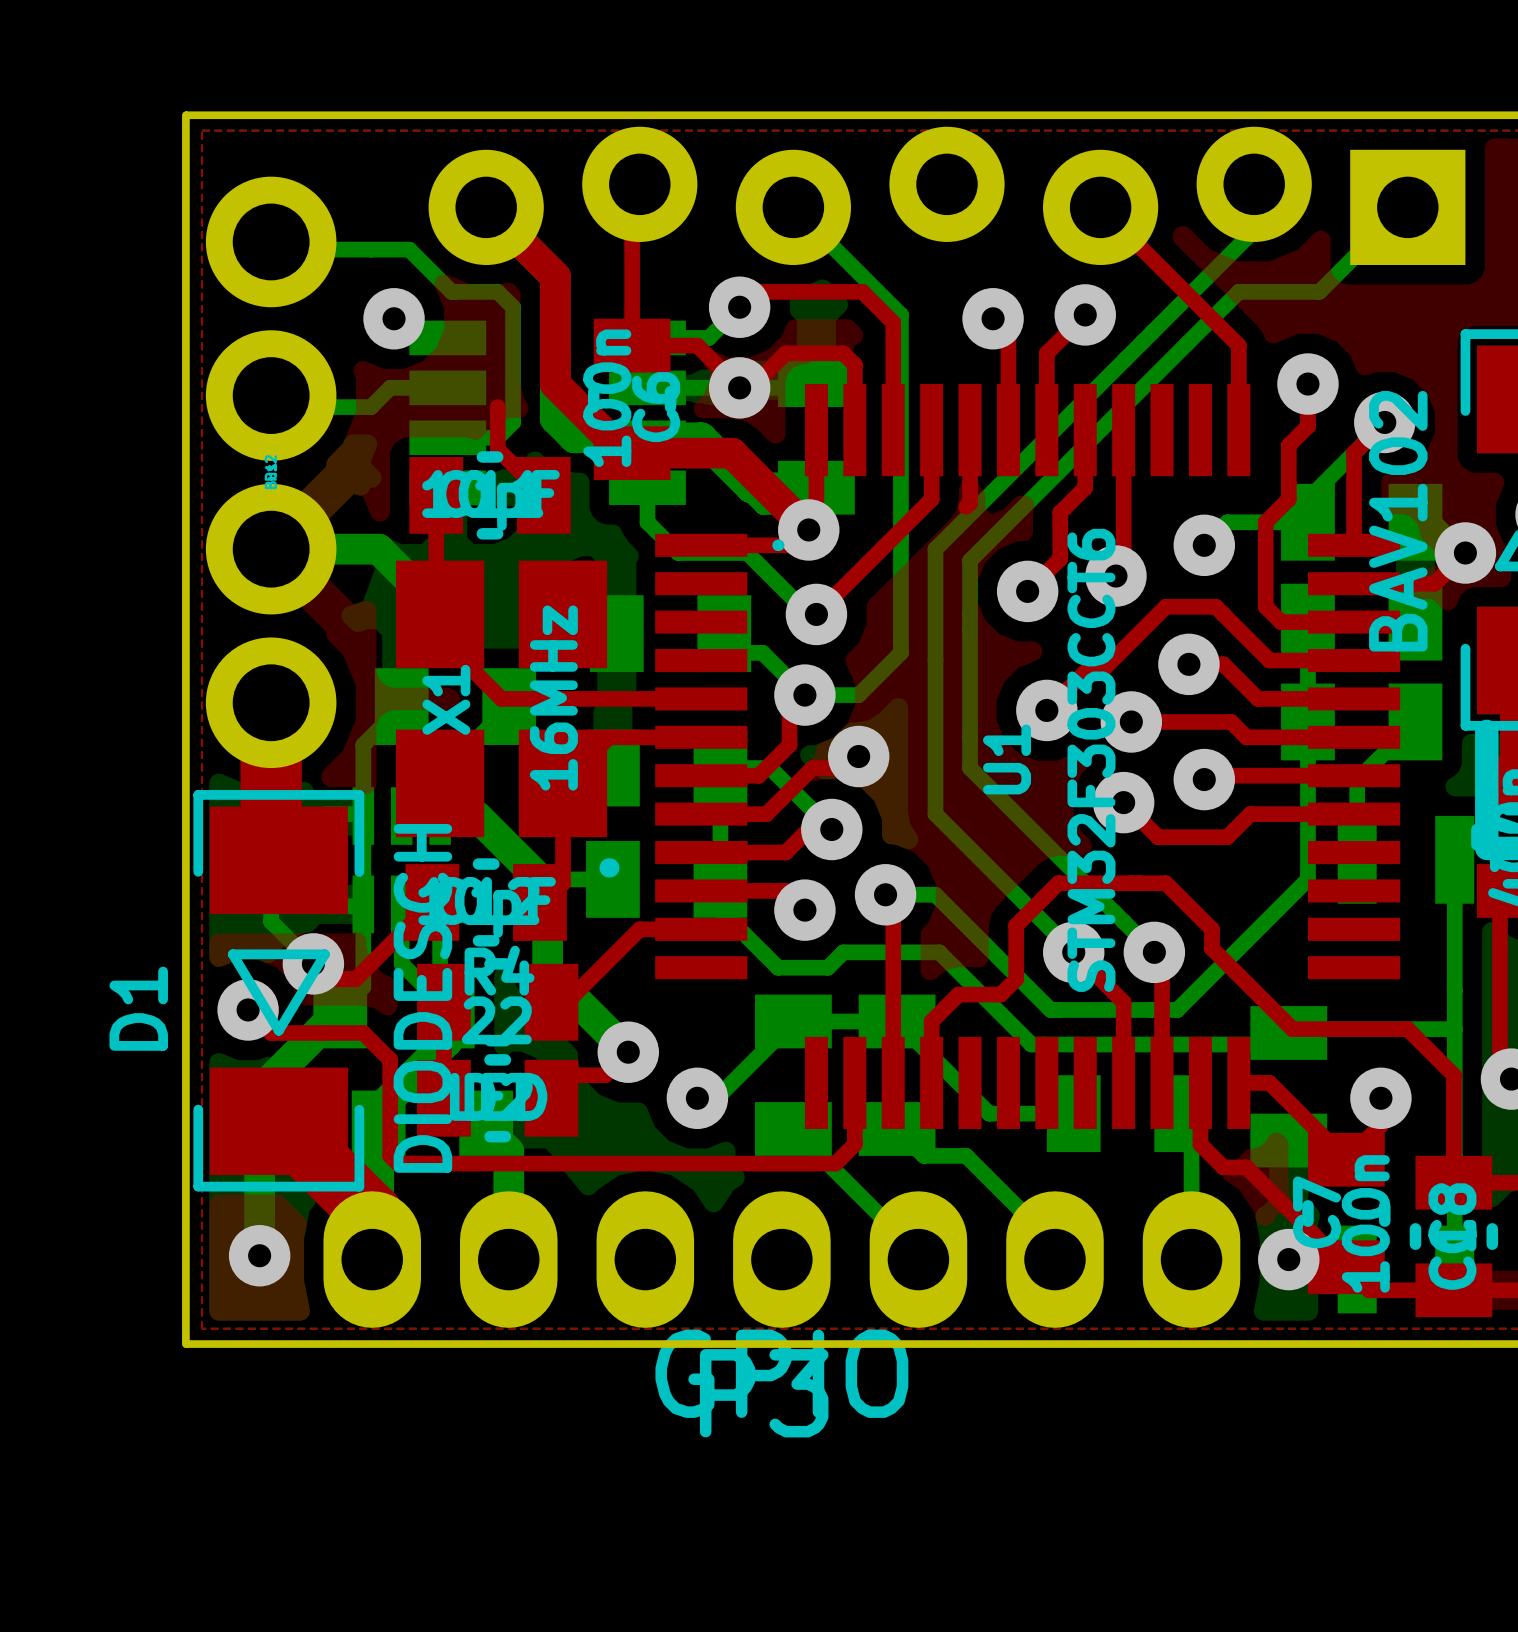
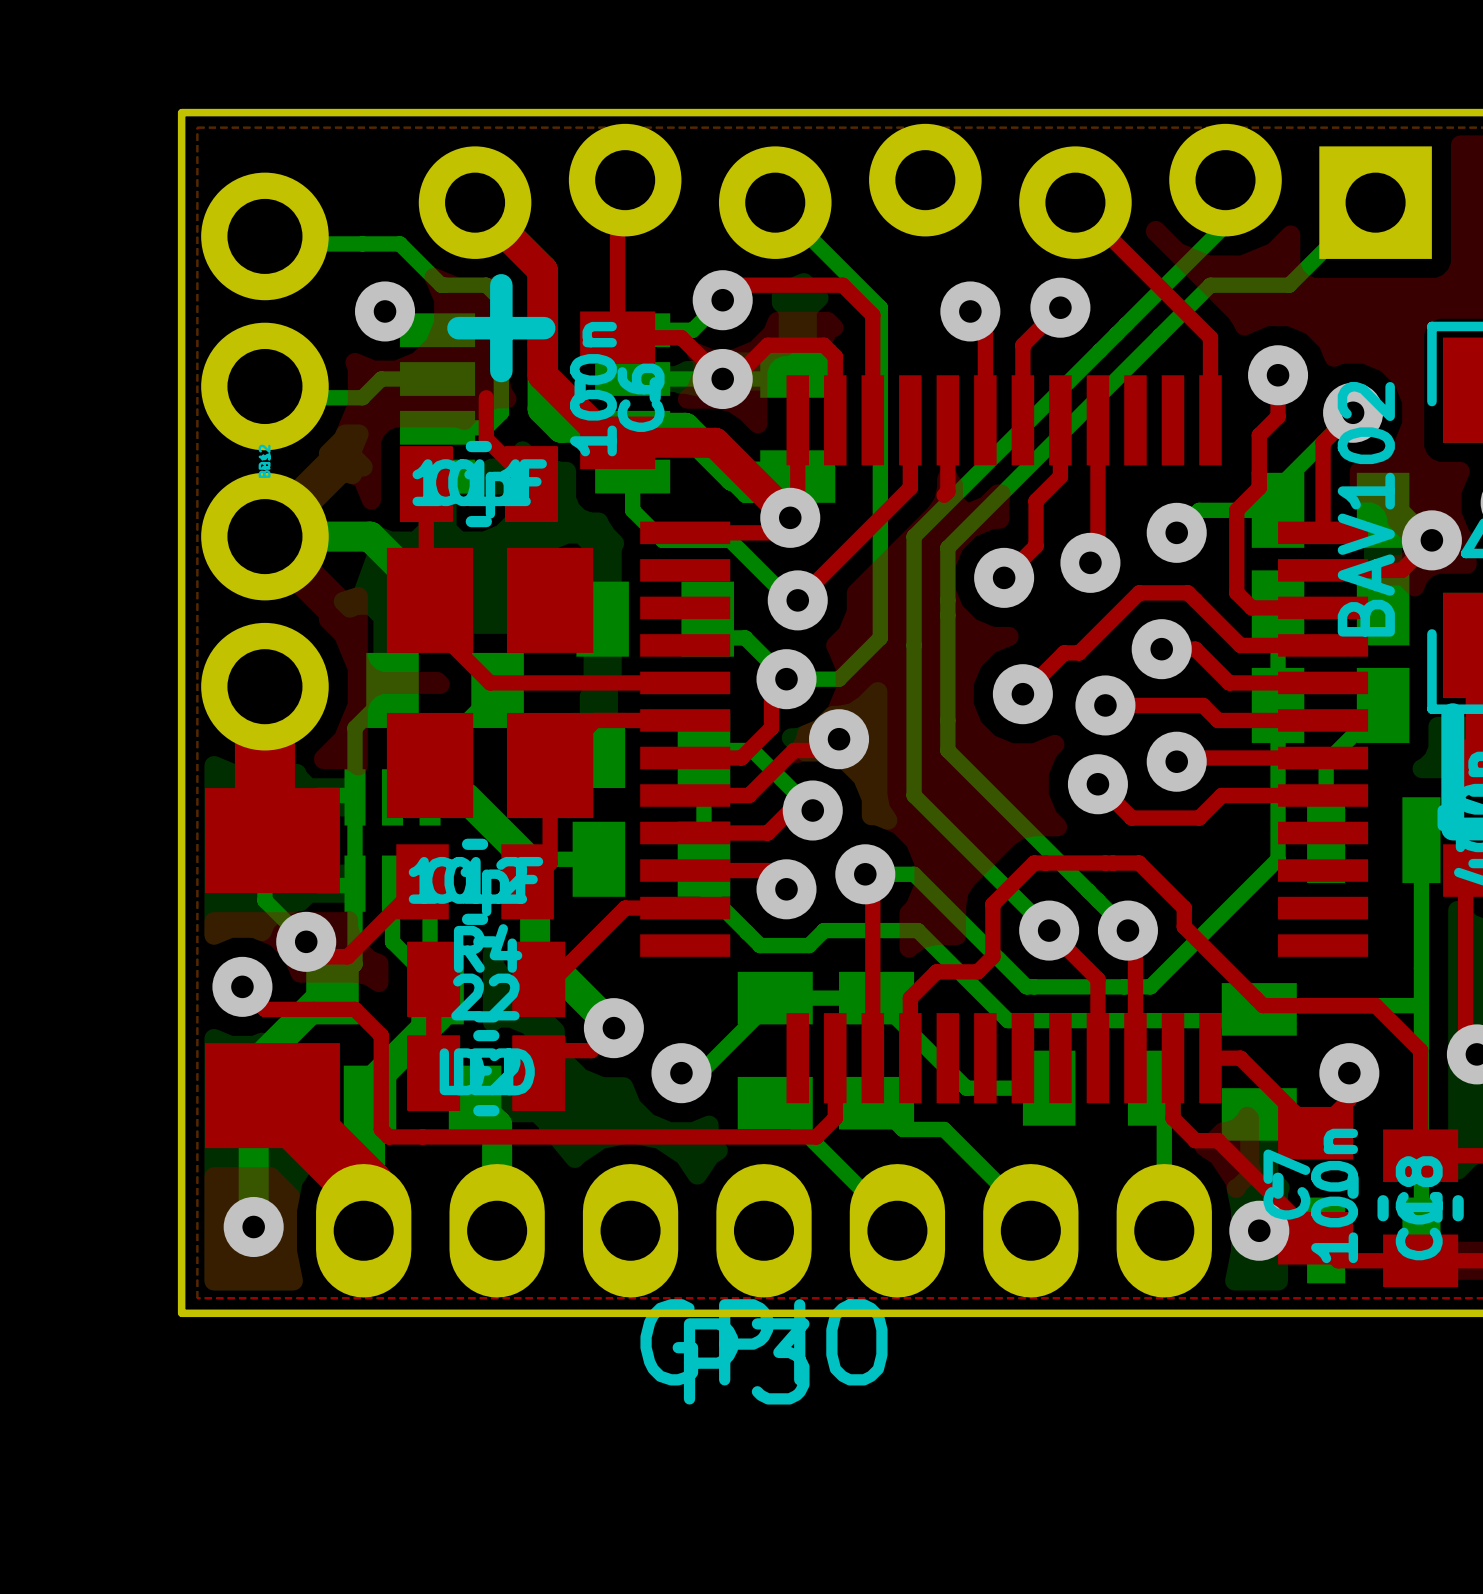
text: none -> + (501, 328)
part: none -> (478, 484)
part: none -> (490, 682)
X1: 16MHz (507, 719) -> none
U1: STM32F303CCT6 (1027, 756) -> none
D1: DIODESCH (278, 990) -> none
part: none -> (486, 979)
part: none -> (486, 1073)

